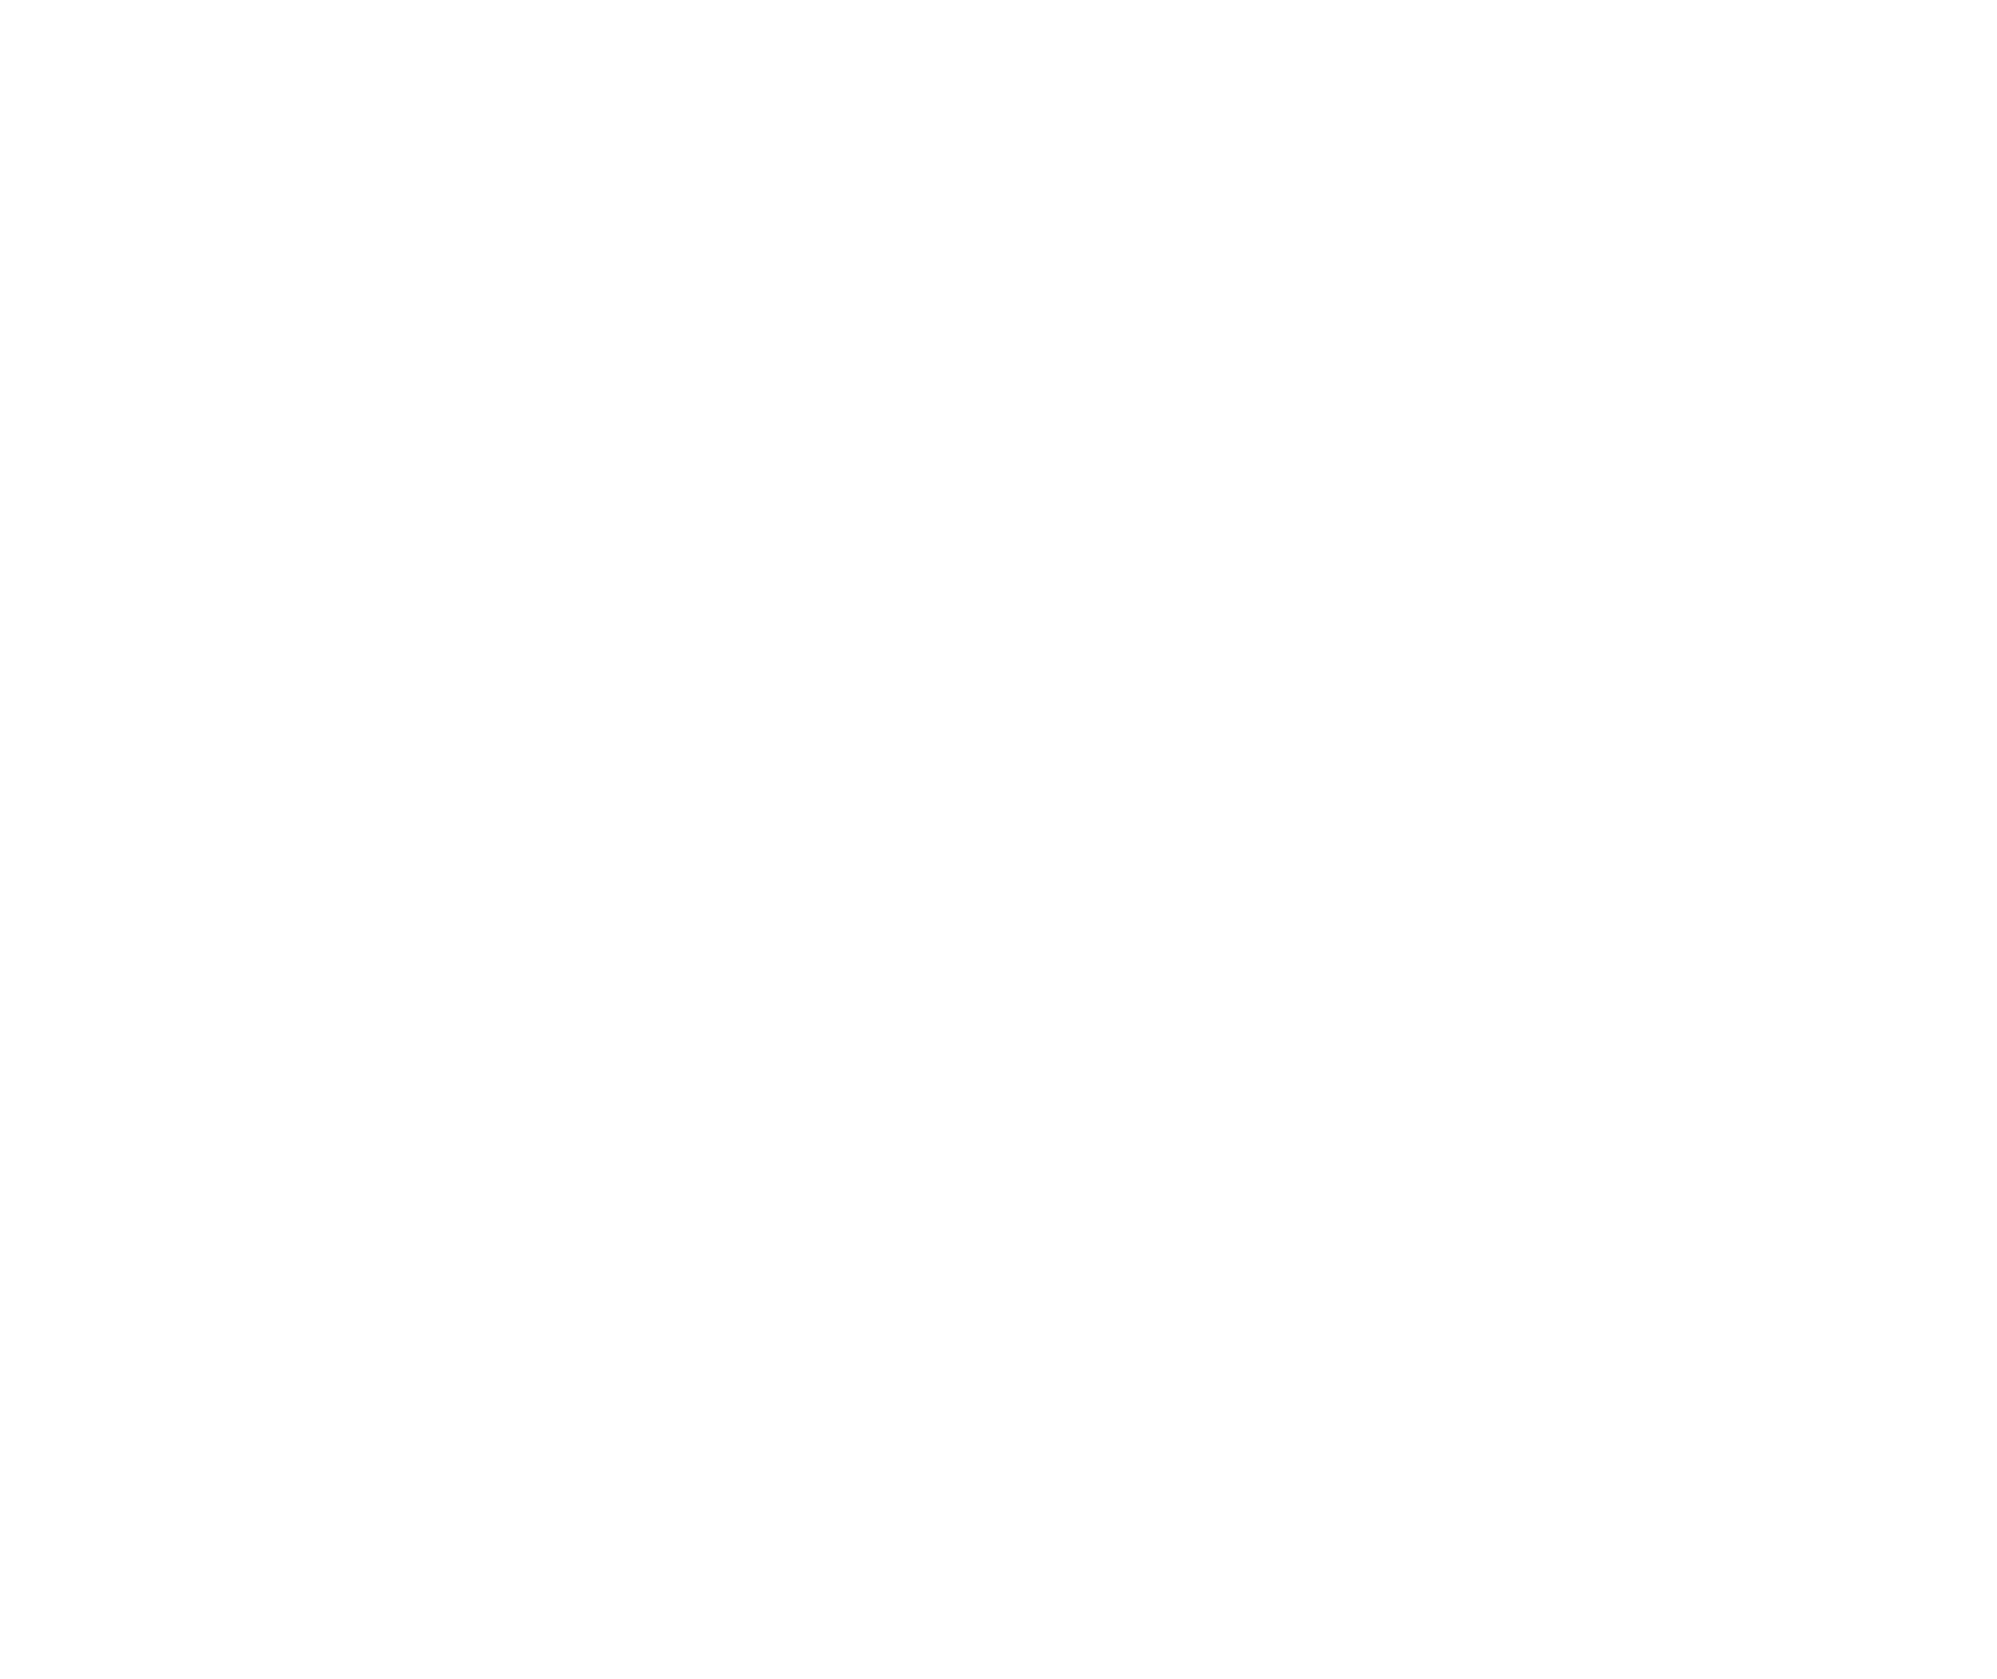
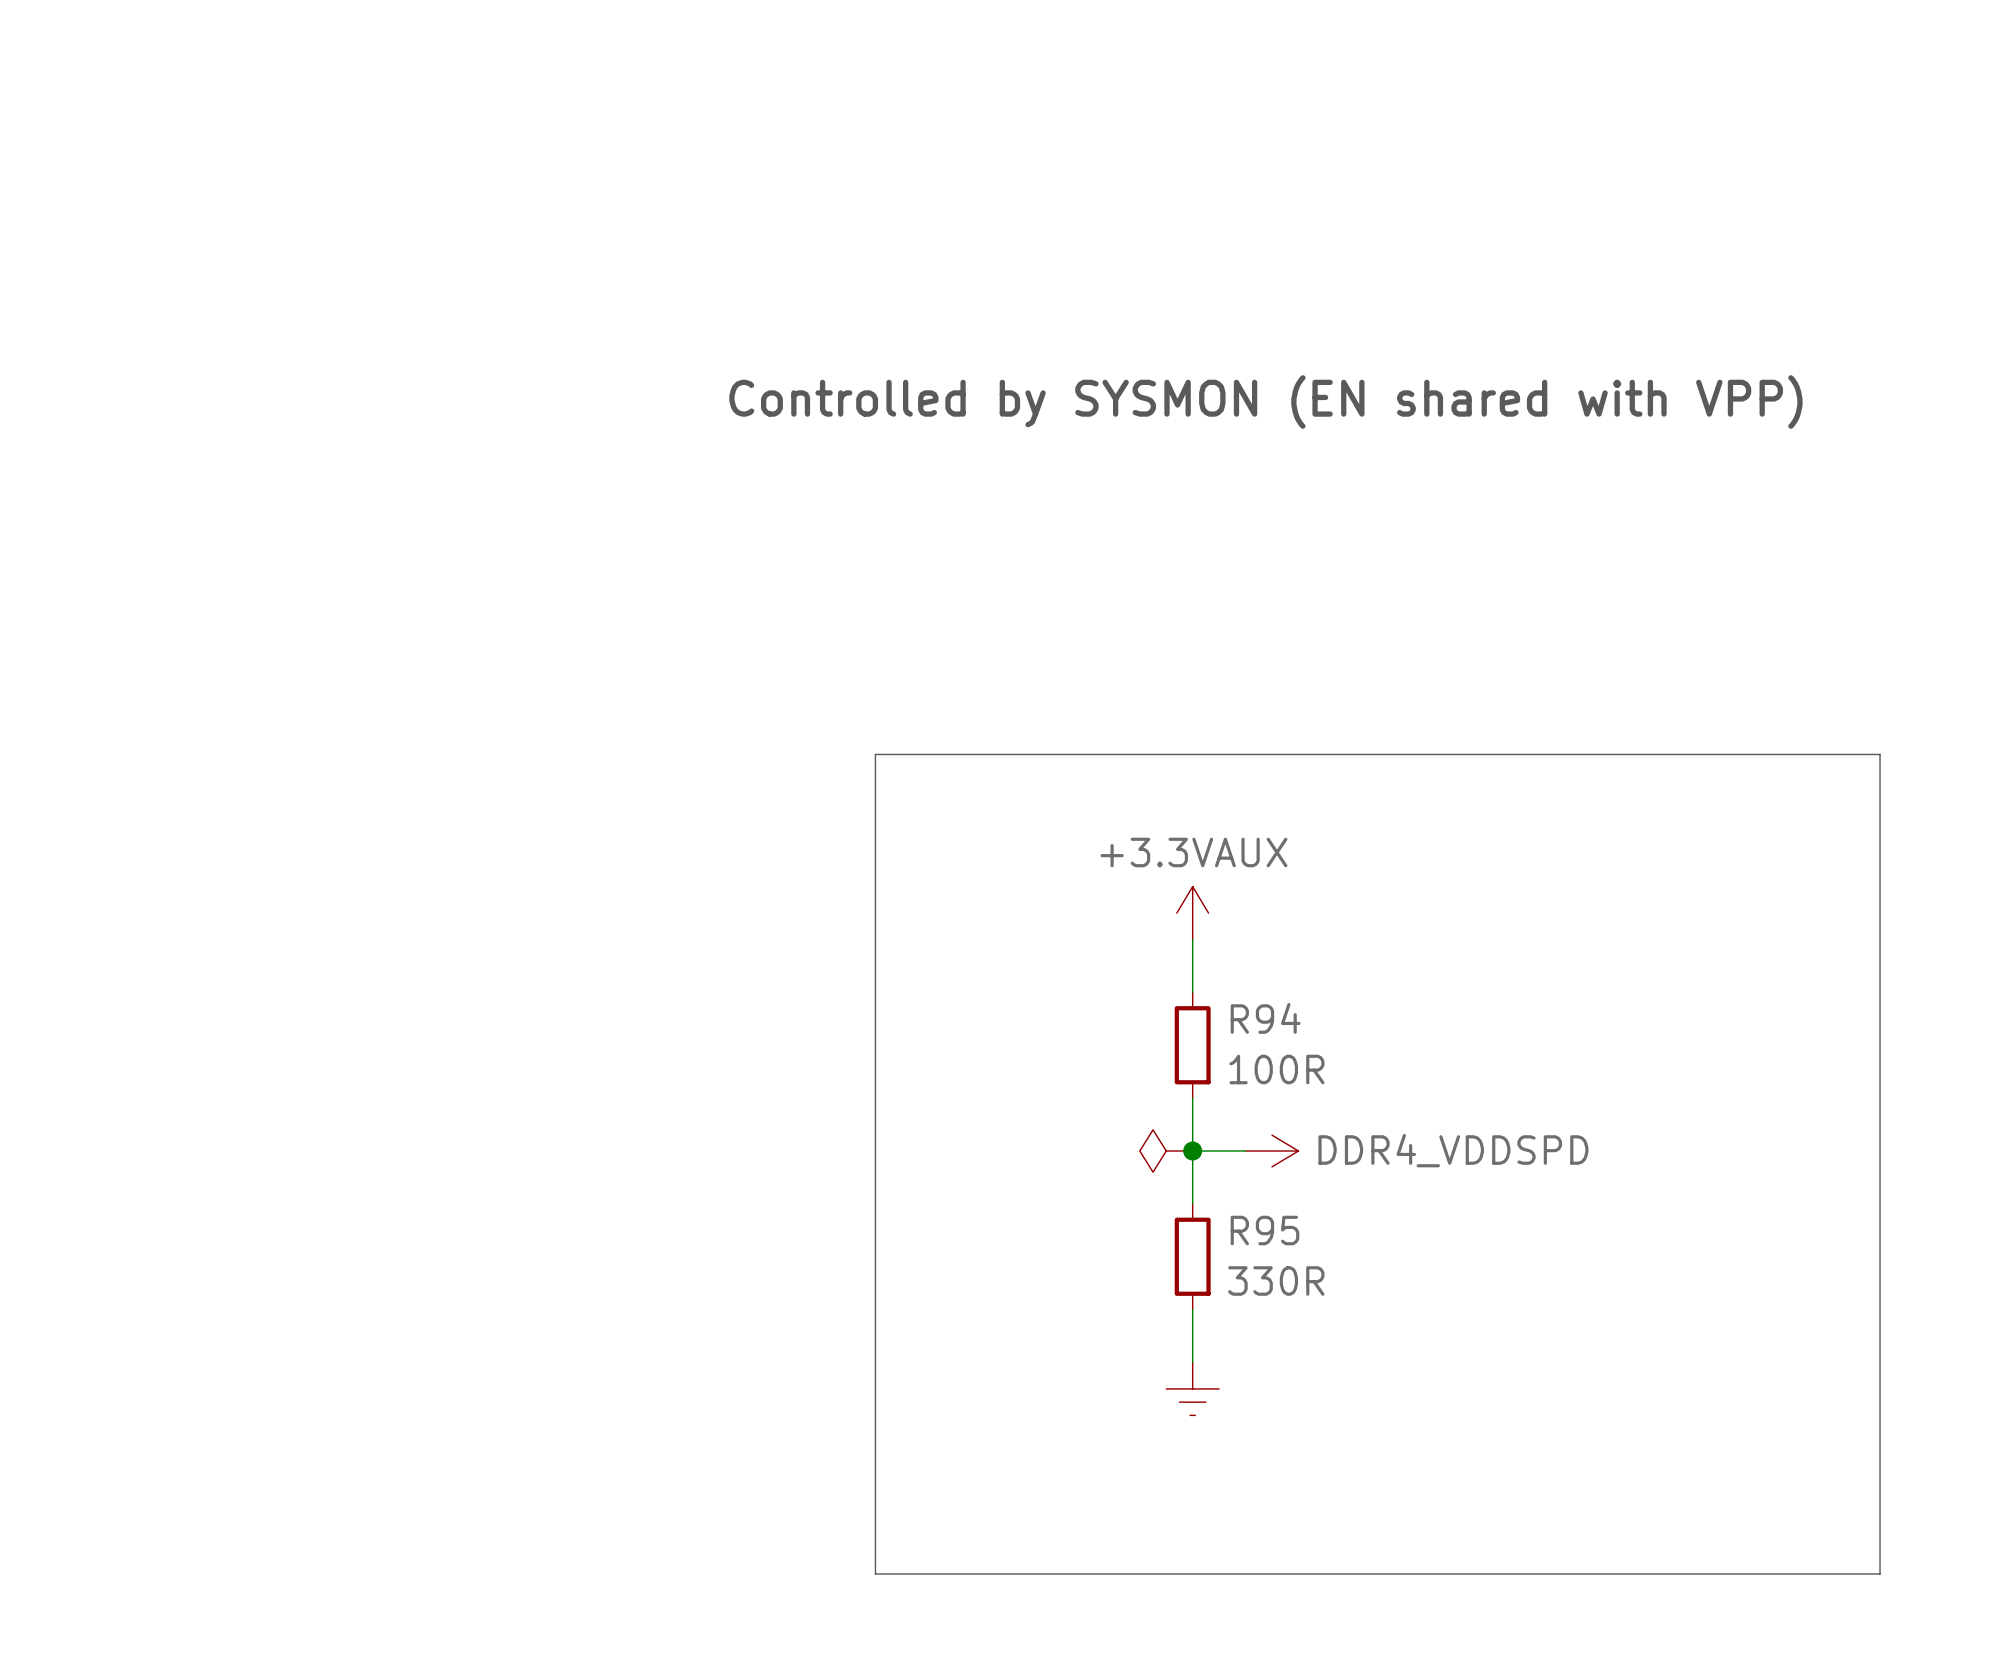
text: none -> Controlled by SYSMON (EN shared with VPP) (1265, 401)
line: none -> (875, 754) (1880, 754) (1880, 1573) (875, 1573) (875, 754)
power symbol: none -> +3.3VAUX (1192, 913)
wire: none -> (1192, 939) (1192, 992)
R94: none -> 100R (1192, 1045)
wire: none -> (1192, 1098) (1192, 1203)
power symbol: none -> (1166, 1151)
wire: none -> (1192, 1151) (1245, 1151)
junction: none -> (1192, 1151)
power symbol: none -> DDR4_VDDSPD (1271, 1151)
R95: none -> 330R (1192, 1256)
wire: none -> (1192, 1309) (1192, 1362)
power symbol: none -> (1192, 1388)

